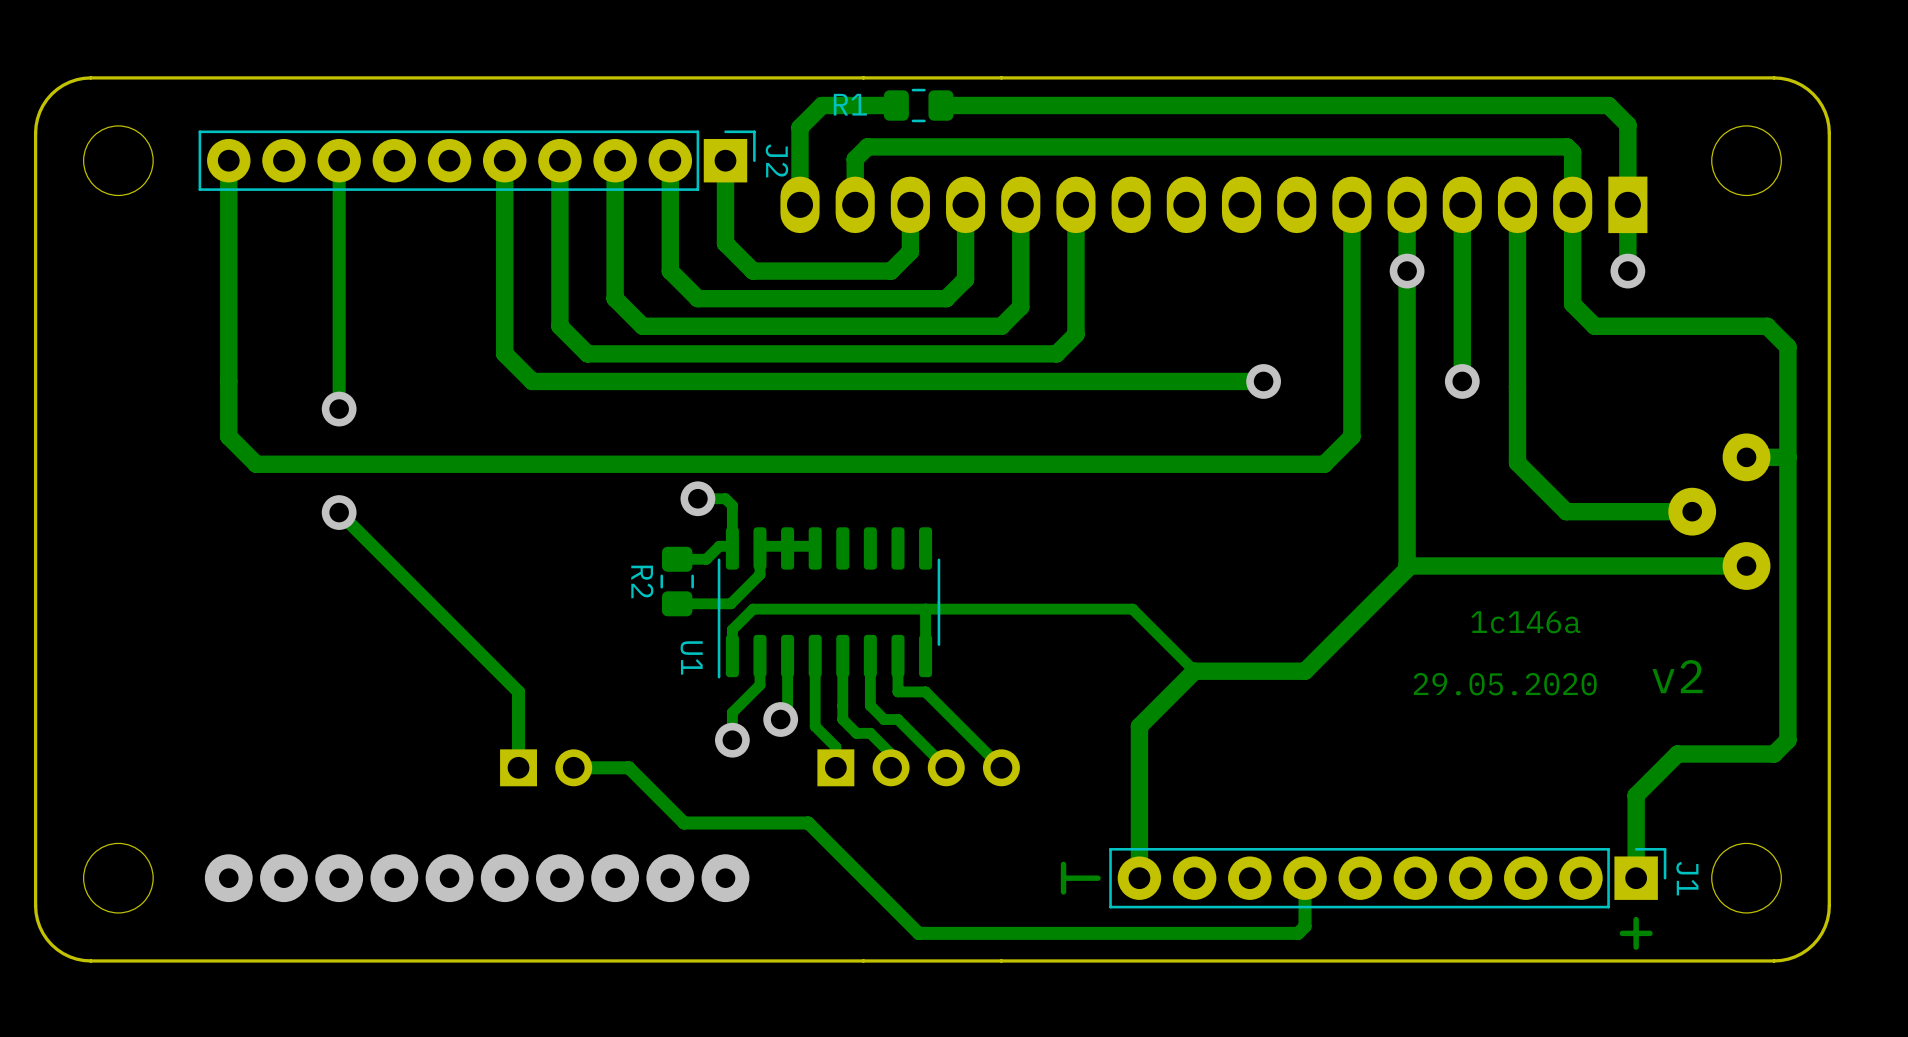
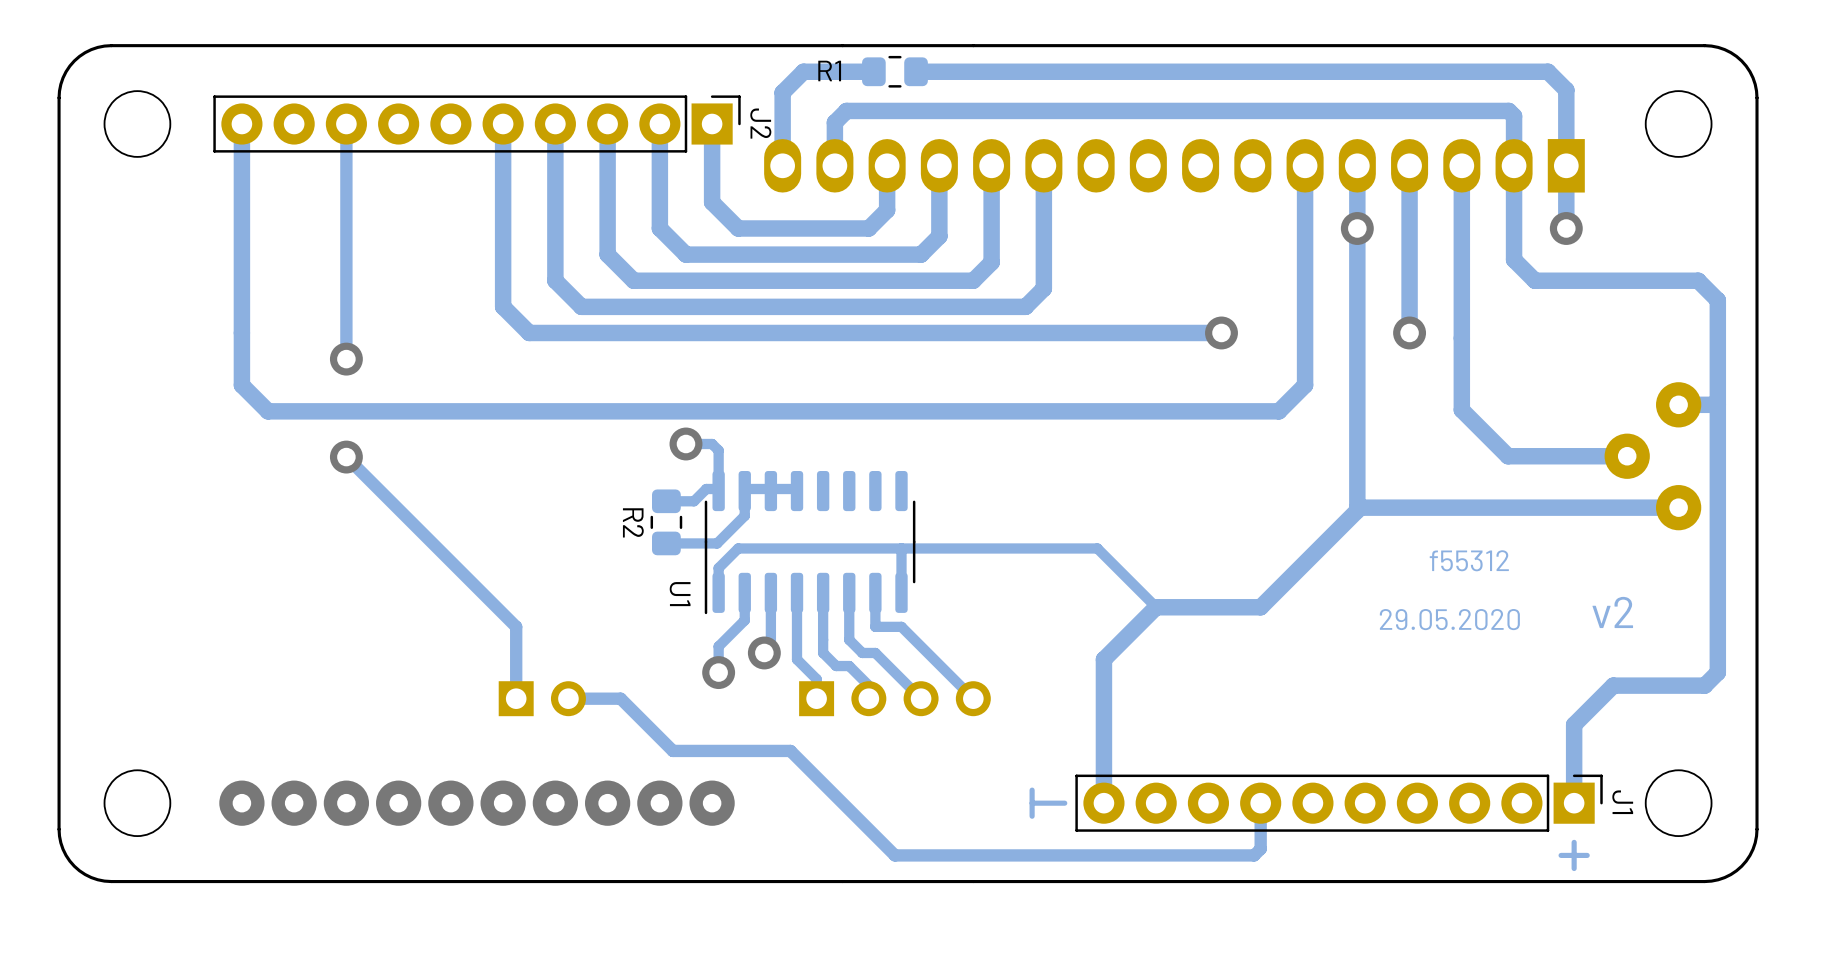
text: 1c146a (1525, 622) -> f55312 (1469, 560)

